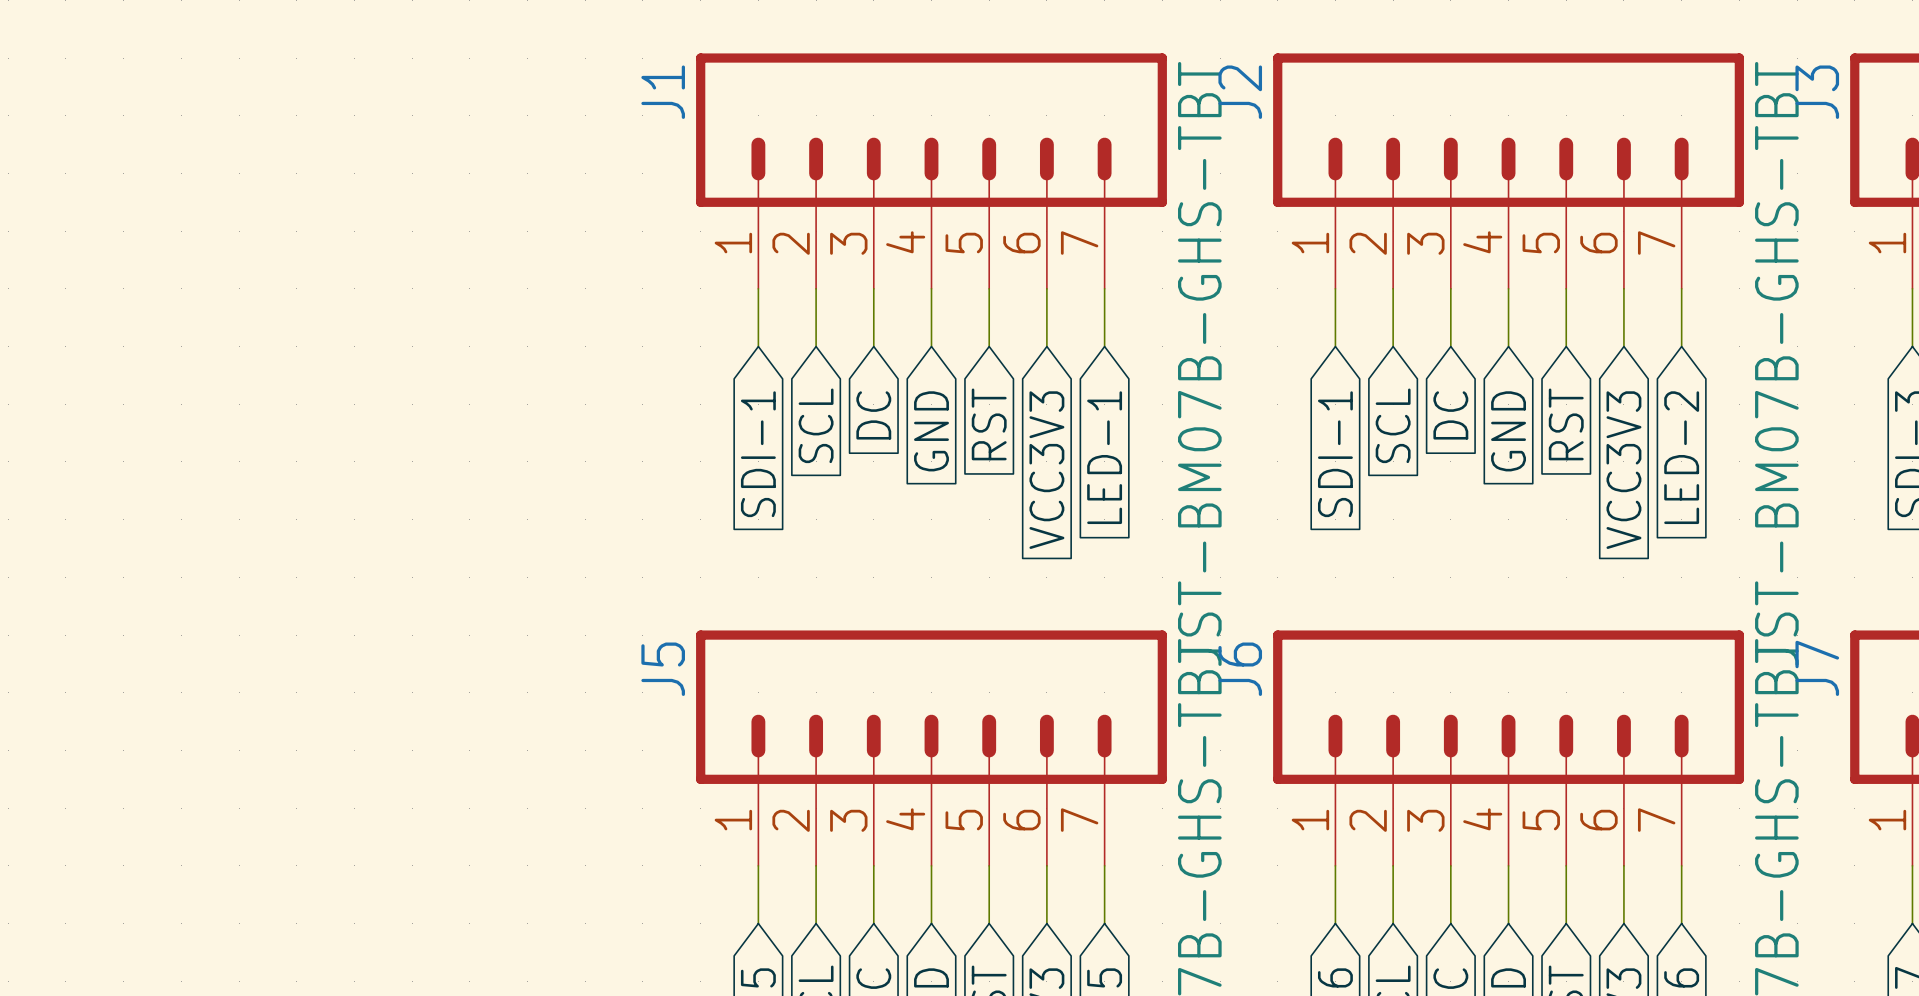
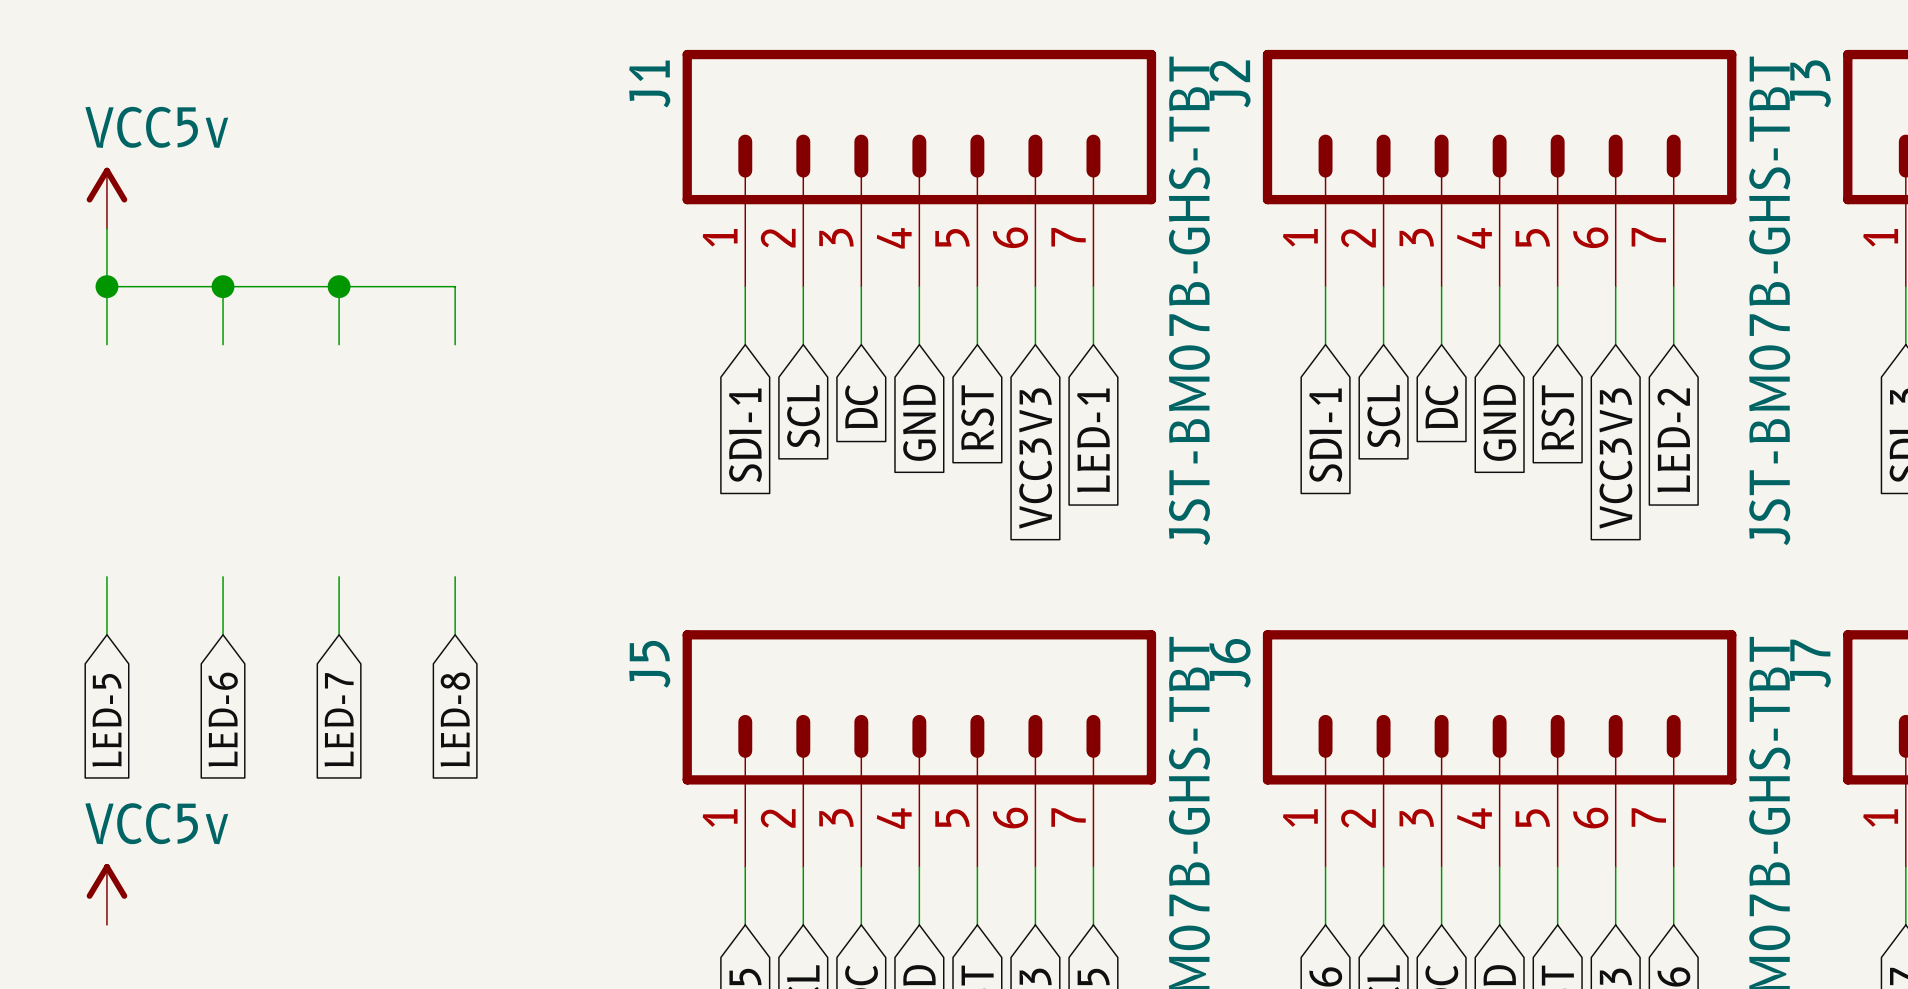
power symbol: none -> VCC5v (106, 198)
wire: none -> (106, 228) (106, 344)
wire: none -> (106, 286) (455, 286) (455, 344)
junction: none -> (106, 286)
wire: none -> (223, 286) (223, 344)
junction: none -> (223, 286)
wire: none -> (339, 286) (339, 344)
junction: none -> (339, 286)
wire: none -> (106, 576) (106, 634)
wire: none -> (223, 576) (223, 634)
wire: none -> (339, 576) (339, 634)
wire: none -> (455, 576) (455, 634)
global label: none -> LED-7 (339, 719)
global label: none -> LED-5 (106, 720)
global label: none -> LED-6 (223, 719)
global label: none -> LED-8 (455, 719)
power symbol: none -> VCC5v (106, 894)

